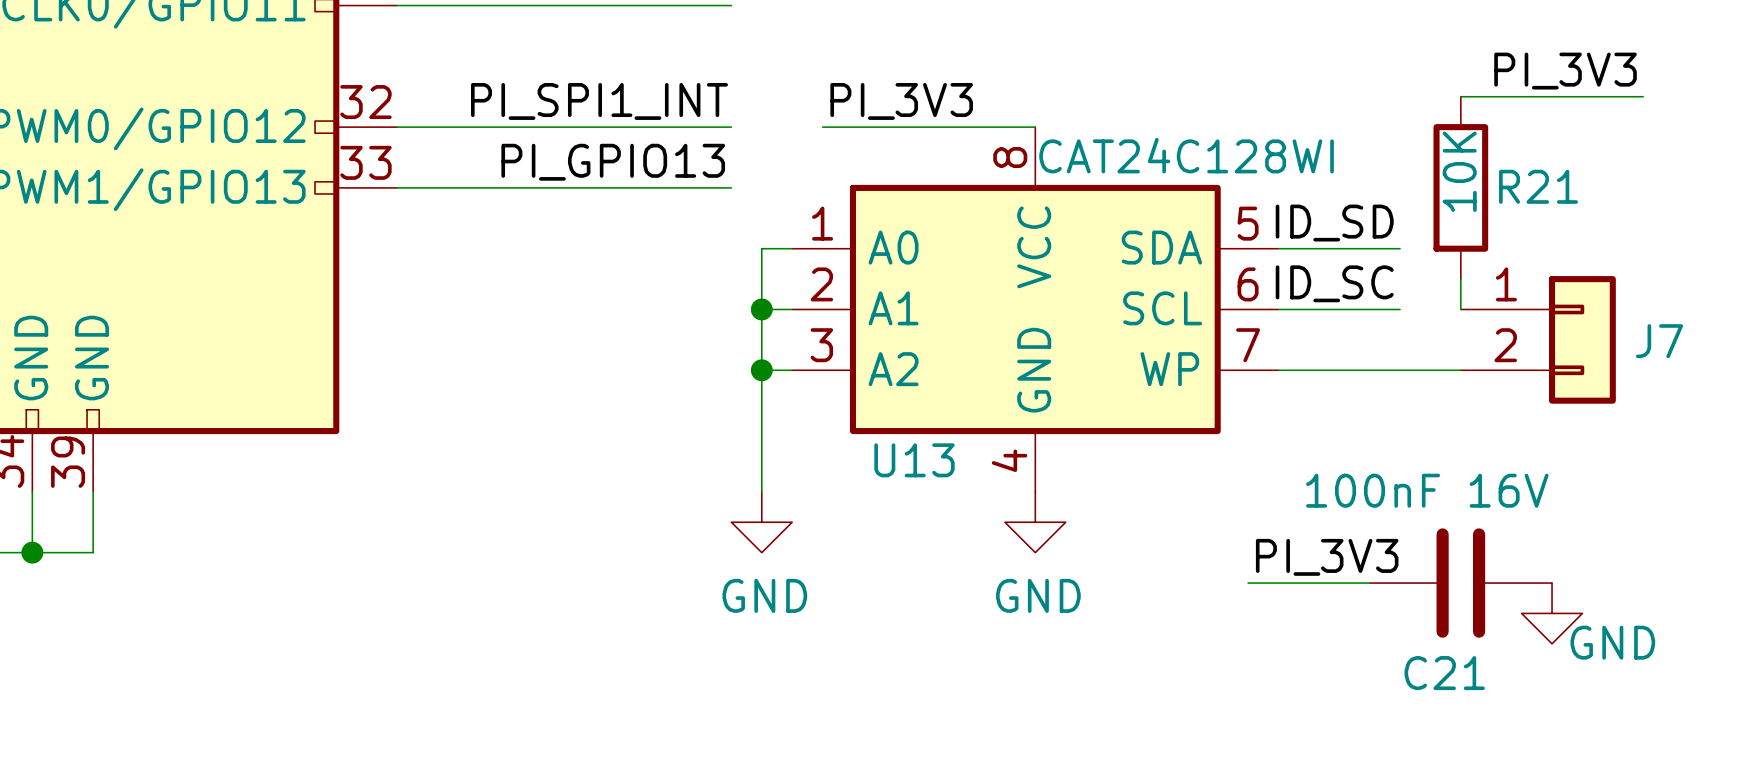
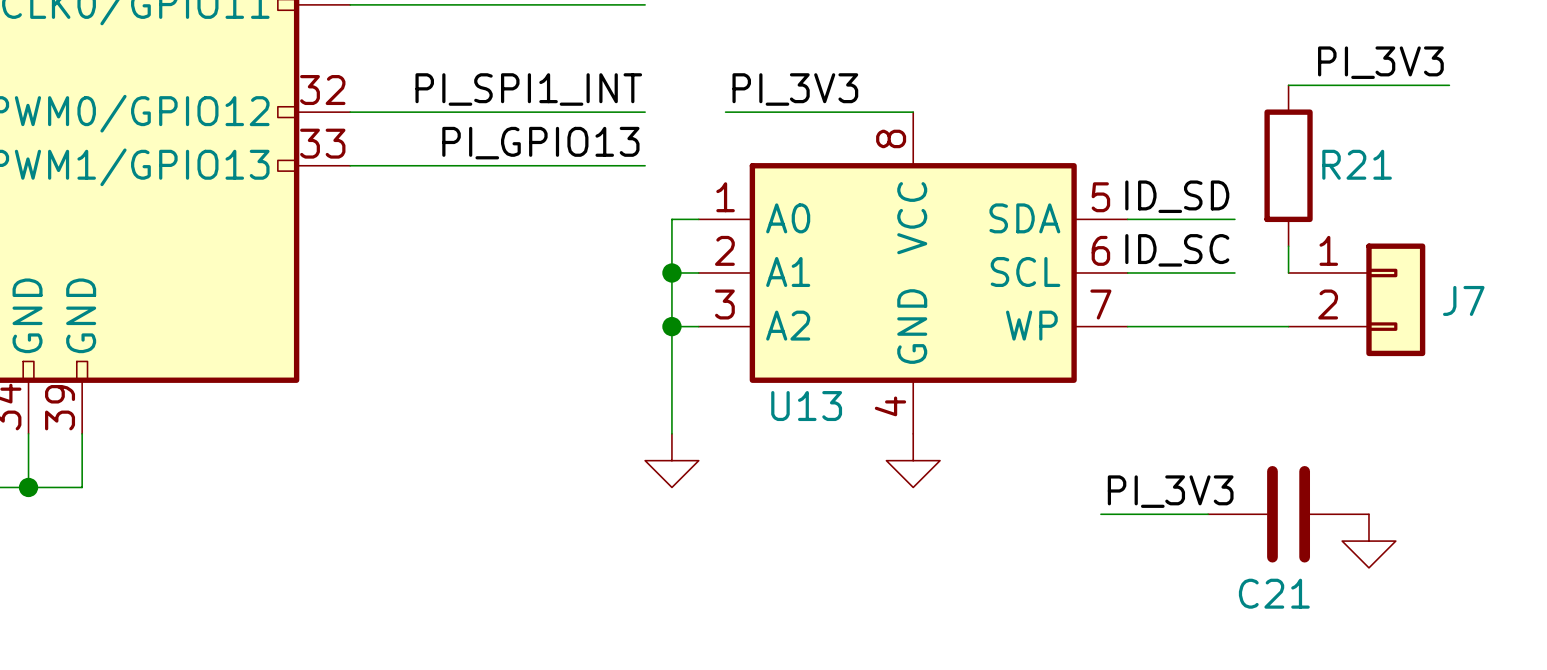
U13 value: CAT24C128WI (1186, 155) -> none
R21 value: 10K (1459, 171) -> none
C21 value: 100nF 16V (1427, 490) -> none
power symbol text: GND (764, 595) -> none
power symbol text: GND (1038, 595) -> none
power symbol text: GND (1612, 642) -> none

